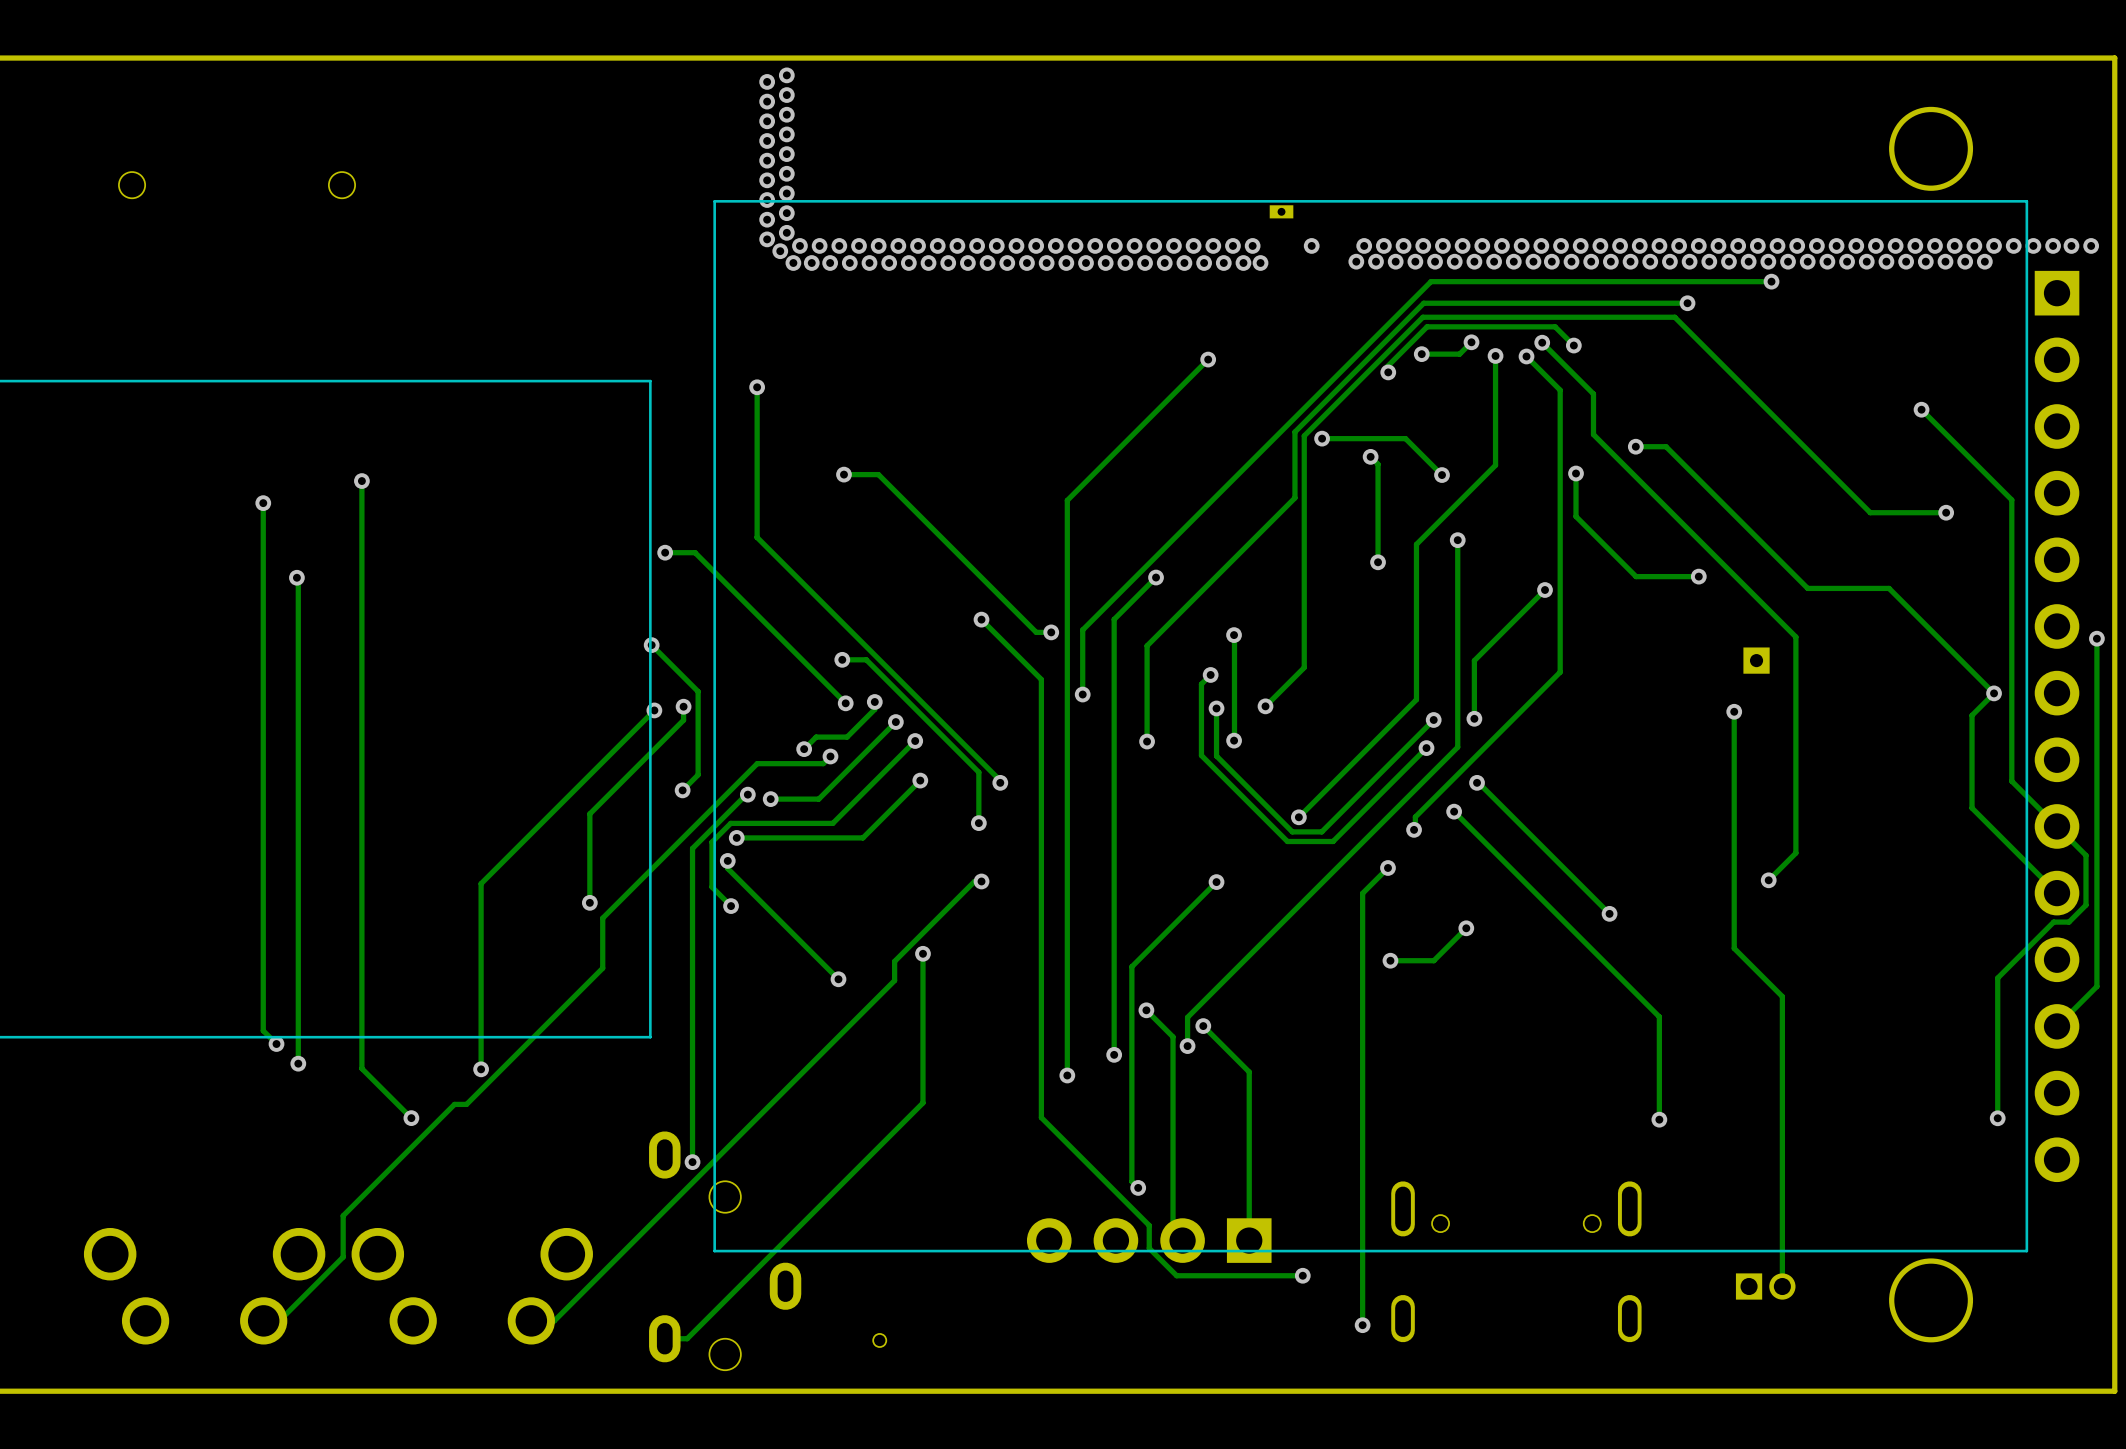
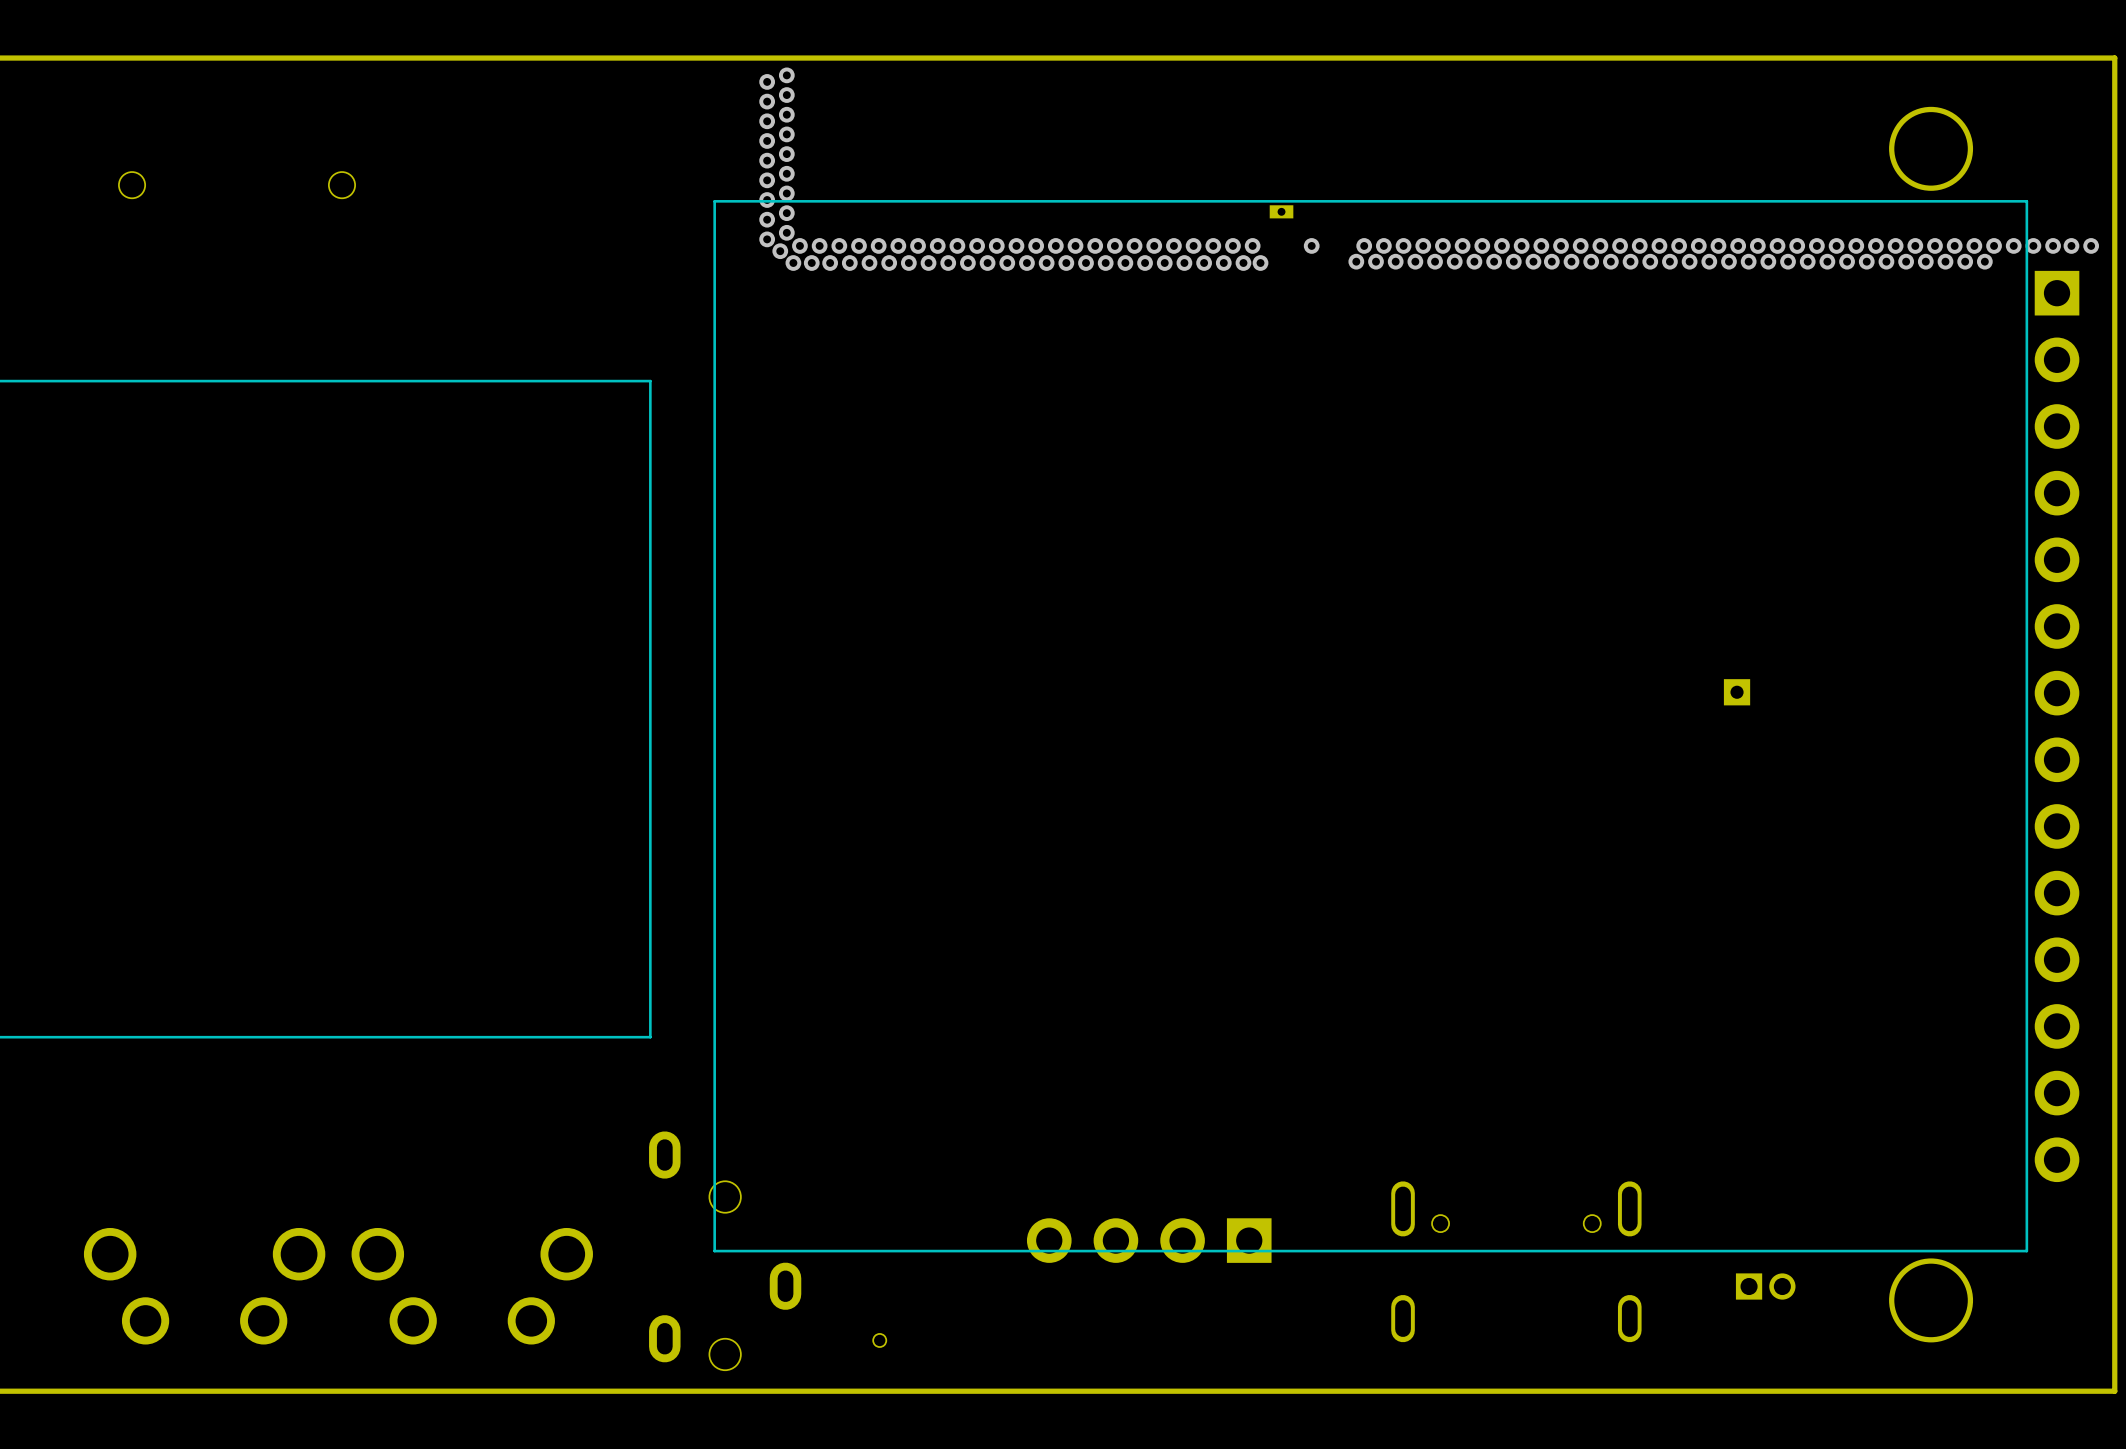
track: (1771, 281) (1431, 281) (1082, 629) (1082, 694) -> none
via: (1771, 281) -> none
track: (1687, 303) (1423, 303) (1294, 431) (1294, 497) (1147, 645) (1147, 741) -> none
via: (1687, 303) -> none
track: (1471, 342) (1459, 354) (1421, 354) -> none
via: (1471, 342) -> none
track: (1542, 342) (1593, 393) (1593, 434) (1795, 636) (1795, 853) (1768, 880) -> none
via: (1542, 342) -> none
track: (1573, 345) (1555, 326) (1427, 326) (1387, 366) (1388, 372) -> none
via: (1573, 345) -> none
via: (1421, 354) -> none
track: (1495, 355) (1495, 465) (1416, 544) (1416, 699) (1298, 817) -> none
via: (1495, 355) -> none
track: (1526, 356) (1560, 390) (1560, 672) (1415, 817) (1414, 829) -> none
via: (1526, 356) -> none
track: (1208, 359) (1067, 500) (1067, 1075) -> none
via: (1208, 359) -> none
via: (1388, 372) -> none
track: (757, 387) (757, 537) (1000, 780) (1000, 782) -> none
via: (757, 387) -> none
track: (1921, 409) (2011, 499) (2011, 781) (2086, 855) (2086, 905) (2069, 922) (2053, 922) (1997, 978) (1997, 1118) -> none
via: (1921, 409) -> none
track: (1322, 438) (1405, 438) (1442, 475) -> none
via: (1322, 438) -> none
track: (1635, 446) (1666, 446) (1807, 588) (1889, 588) (1994, 693) (1972, 715) (1972, 808) (2057, 893) -> none
via: (1635, 446) -> none
track: (1370, 456) (1378, 464) (1378, 562) -> none
via: (1370, 456) -> none
track: (1576, 473) (1576, 516) (1636, 576) (1698, 576) -> none
via: (1576, 473) -> none
track: (843, 474) (878, 474) (1036, 632) (1051, 632) -> none
via: (843, 474) -> none
via: (1442, 475) -> none
track: (361, 481) (361, 1068) (411, 1118) -> none
via: (361, 481) -> none
track: (263, 503) (263, 1030) (276, 1044) -> none
via: (263, 503) -> none
track: (1946, 512) (1870, 512) (1674, 317) (1422, 317) (1304, 435) (1304, 667) (1265, 706) -> none
via: (1946, 512) -> none
track: (1457, 540) (1457, 747) (1187, 1017) (1187, 1046) -> none
via: (1457, 540) -> none
track: (665, 552) (695, 552) (845, 703) -> none
via: (665, 552) -> none
via: (1378, 562) -> none
via: (1698, 576) -> none
track: (296, 577) (298, 1063) -> none
via: (296, 577) -> none
track: (1156, 577) (1114, 619) (1114, 1054) -> none
via: (1156, 577) -> none
track: (1545, 590) (1474, 660) (1474, 718) -> none
via: (1545, 590) -> none
track: (981, 619) (1041, 679) (1041, 1117) (1149, 1225) (1149, 1248) (1176, 1275) (1302, 1275) -> none
via: (981, 619) -> none
via: (1051, 632) -> none
track: (1234, 635) (1234, 740) -> none
via: (1234, 635) -> none
track: (2096, 638) (2096, 986) (2057, 1026) -> none
via: (2096, 638) -> none
track: (651, 645) (698, 691) (698, 774) (682, 790) -> none
via: (651, 645) -> none
track: (842, 659) (866, 659) (978, 772) (978, 823) -> none
via: (842, 659) -> none
part position: (1756, 660) -> (1737, 692)
track: (1210, 674) (1201, 684) (1201, 755) (1287, 841) (1333, 841) (1426, 748) -> none
via: (1210, 674) -> none
via: (1994, 693) -> none
via: (1082, 694) -> none
track: (874, 701) (874, 709) (847, 737) (816, 737) (804, 749) -> none
via: (874, 701) -> none
via: (845, 703) -> none
track: (683, 706) (683, 720) (589, 813) (589, 902) -> none
via: (683, 706) -> none
via: (1265, 706) -> none
track: (1216, 708) (1216, 756) (1292, 831) (1321, 831) (1433, 719) -> none
via: (1216, 708) -> none
track: (654, 710) (481, 883) (481, 1069) -> none
via: (654, 710) -> none
track: (1734, 711) (1734, 948) (1782, 996) (1782, 1286) -> none
via: (1734, 711) -> none
via: (1474, 718) -> none
via: (1433, 719) -> none
track: (895, 722) (818, 799) (770, 799) -> none
via: (895, 722) -> none
via: (1234, 740) -> none
track: (915, 741) (832, 823) (730, 823) (711, 842) (711, 886) (731, 906) -> none
via: (915, 741) -> none
via: (1147, 741) -> none
via: (1426, 748) -> none
via: (804, 749) -> none
track: (830, 756) (823, 763) (757, 763) (602, 918) (602, 968) (466, 1104) (454, 1104) (343, 1215) (343, 1257) (279, 1320) (263, 1320) -> none
via: (830, 756) -> none
track: (920, 780) (862, 837) (736, 837) -> none
via: (920, 780) -> none
via: (1000, 782) -> none
track: (1477, 782) (1609, 913) -> none
via: (1477, 782) -> none
via: (682, 790) -> none
track: (747, 794) (692, 848) (692, 1162) -> none
via: (747, 794) -> none
via: (770, 799) -> none
track: (1454, 811) (1659, 1016) (1659, 1119) -> none
via: (1454, 811) -> none
via: (1298, 817) -> none
via: (978, 823) -> none
via: (1414, 829) -> none
via: (736, 837) -> none
track: (727, 860) (727, 868) (838, 979) -> none
via: (727, 860) -> none
track: (1387, 867) (1362, 893) (1362, 1325) -> none
via: (1387, 867) -> none
via: (1768, 880) -> none
track: (981, 881) (974, 881) (894, 961) (894, 980) (554, 1320) (531, 1320) -> none
via: (981, 881) -> none
track: (1216, 882) (1131, 966) (1131, 1181) (1138, 1187) -> none
via: (1216, 882) -> none
via: (589, 902) -> none
via: (731, 906) -> none
via: (1609, 913) -> none
track: (1466, 928) (1433, 960) (1390, 960) -> none
via: (1466, 928) -> none
track: (922, 953) (922, 1102) (687, 1338) (664, 1338) -> none
via: (922, 953) -> none
via: (1390, 960) -> none
via: (838, 979) -> none
track: (1146, 1010) (1173, 1036) (1173, 1231) (1182, 1240) -> none
via: (1146, 1010) -> none
track: (1203, 1026) (1249, 1072) (1249, 1240) -> none
via: (1203, 1026) -> none
via: (276, 1044) -> none
via: (1187, 1046) -> none
via: (1114, 1054) -> none
via: (298, 1063) -> none
via: (481, 1069) -> none
via: (1067, 1075) -> none
via: (411, 1118) -> none
via: (1997, 1118) -> none
via: (1659, 1119) -> none
via: (692, 1162) -> none
via: (1138, 1187) -> none
via: (1302, 1275) -> none
via: (1362, 1325) -> none

